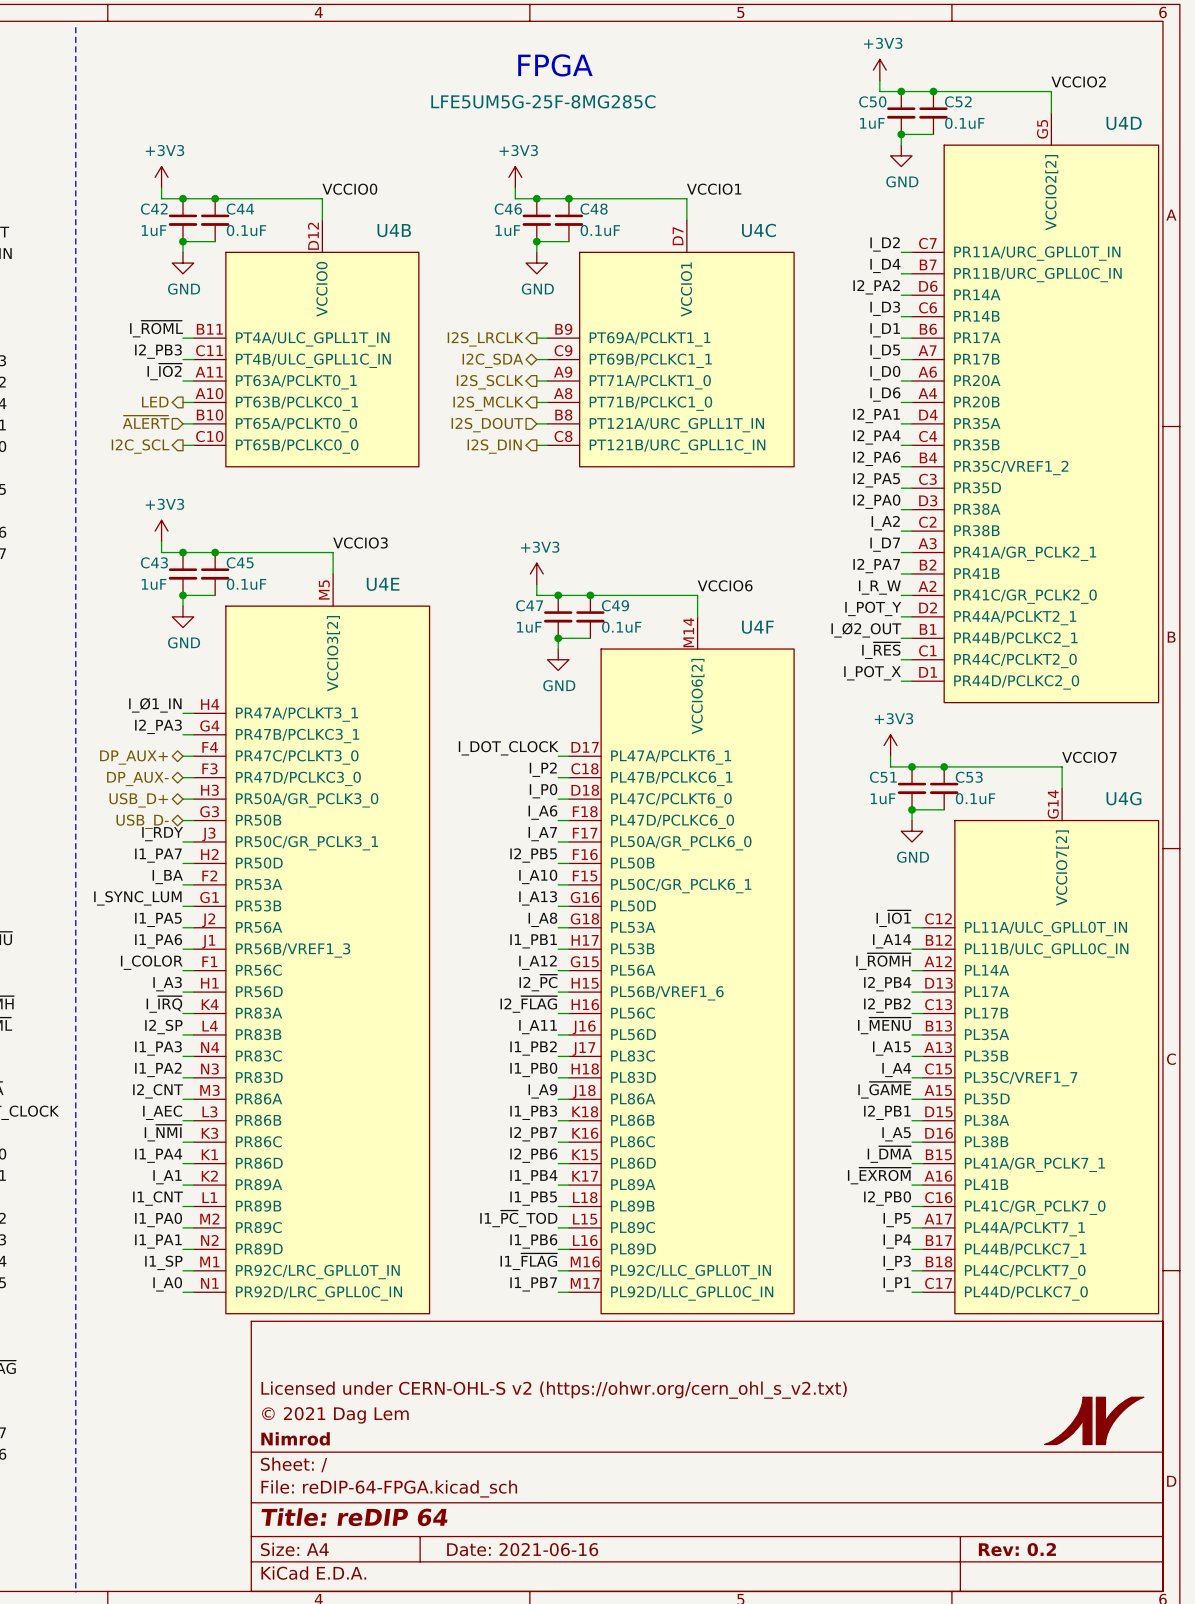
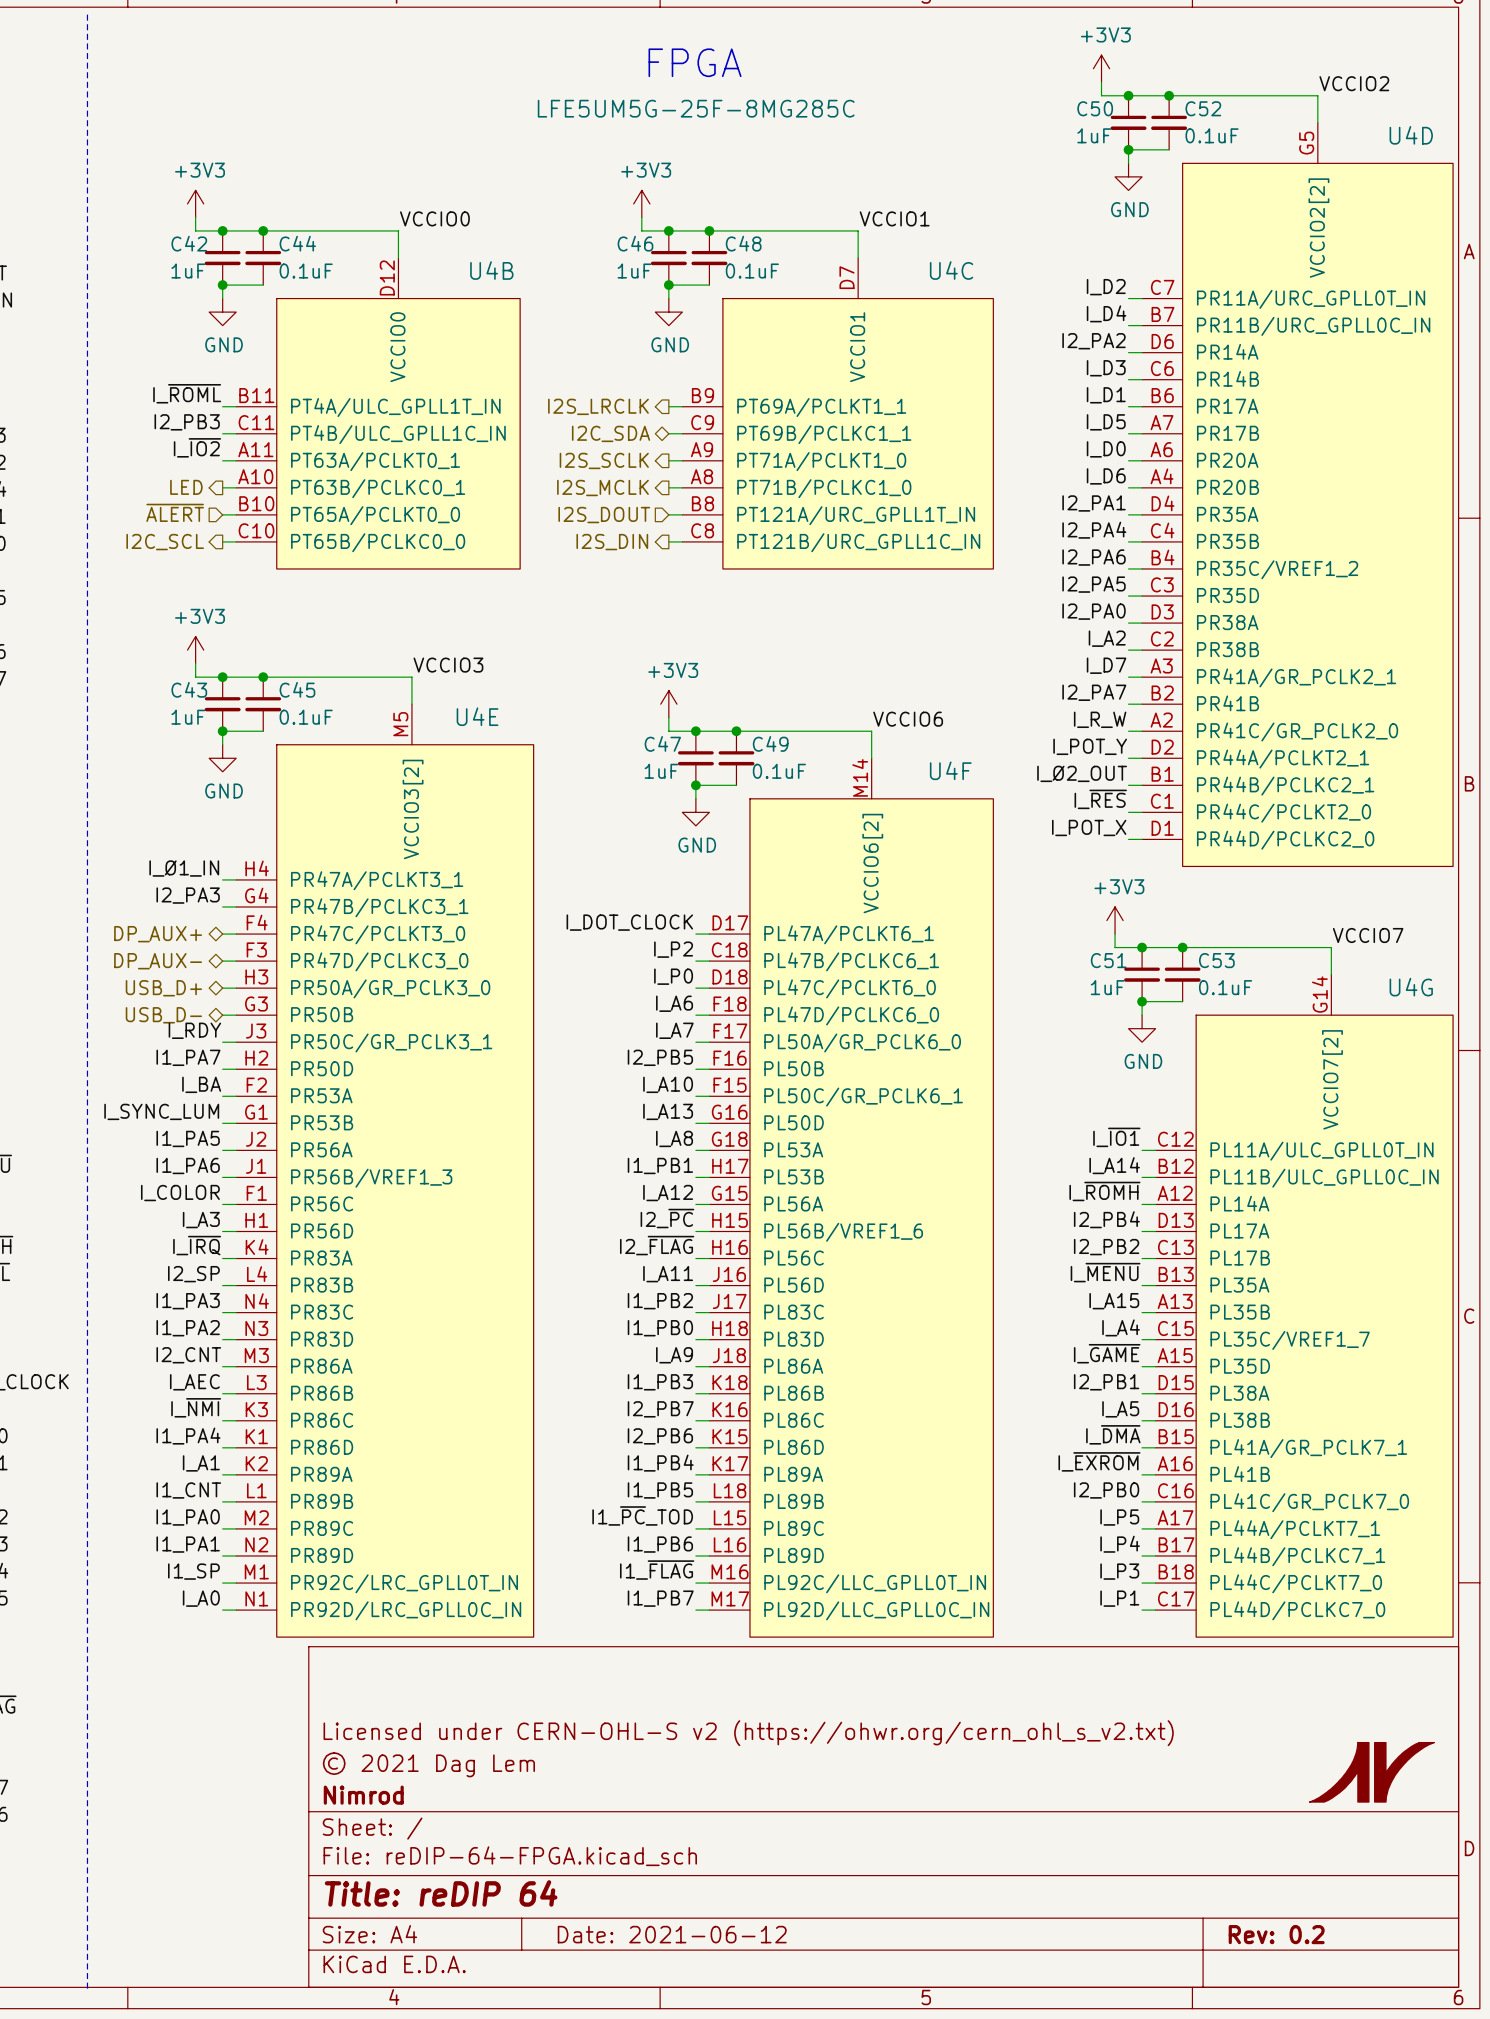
title block: Date: 2021-06-16 (522, 1549) -> Date: 2021-06-12 (672, 1934)

